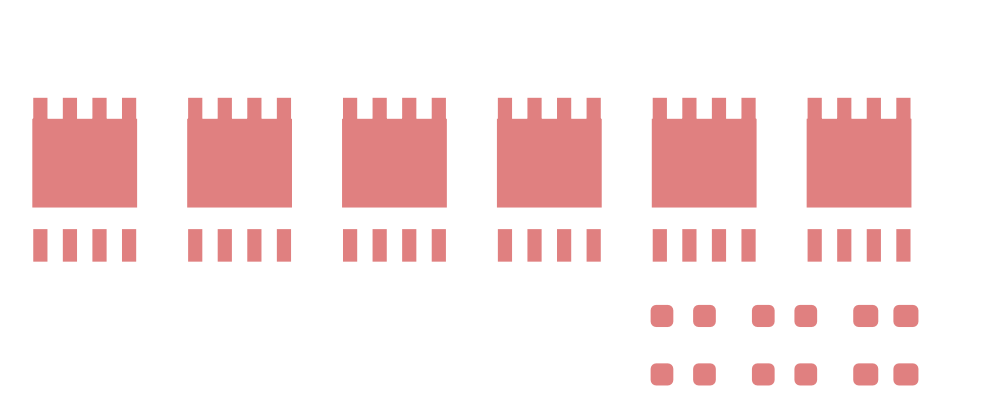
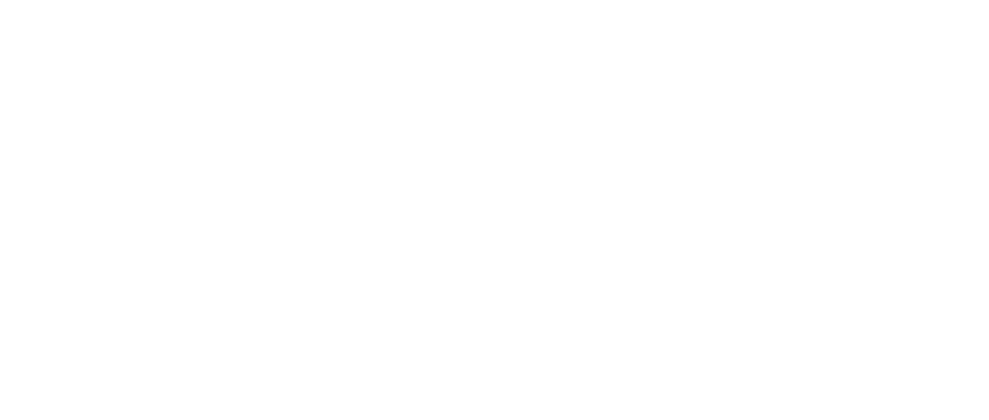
part: (84, 179) -> none
part: (239, 179) -> none
part: (394, 179) -> none
part: (549, 179) -> none
part: (704, 179) -> none
part: (859, 179) -> none
part: (683, 315) -> none
part: (784, 315) -> none
part: (885, 315) -> none
part: (683, 374) -> none
part: (784, 374) -> none
part: (885, 374) -> none

